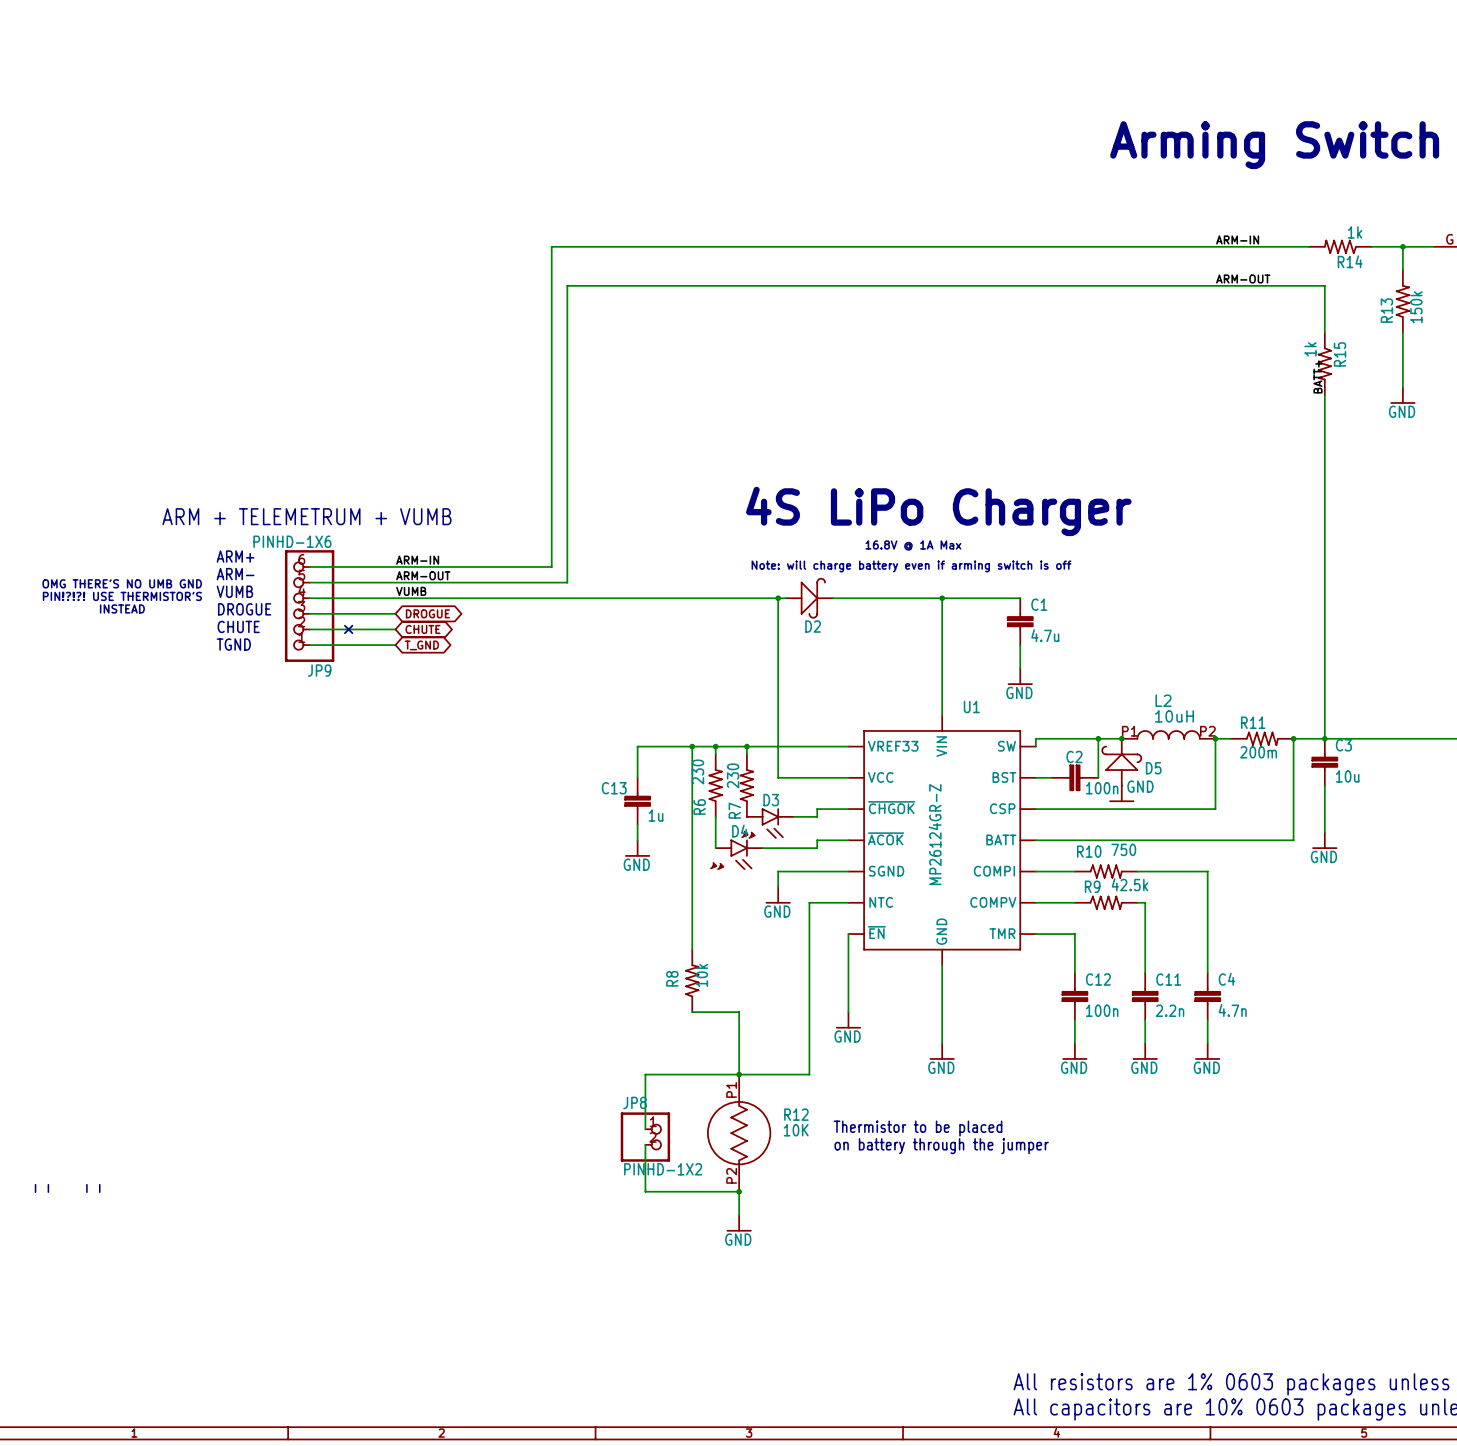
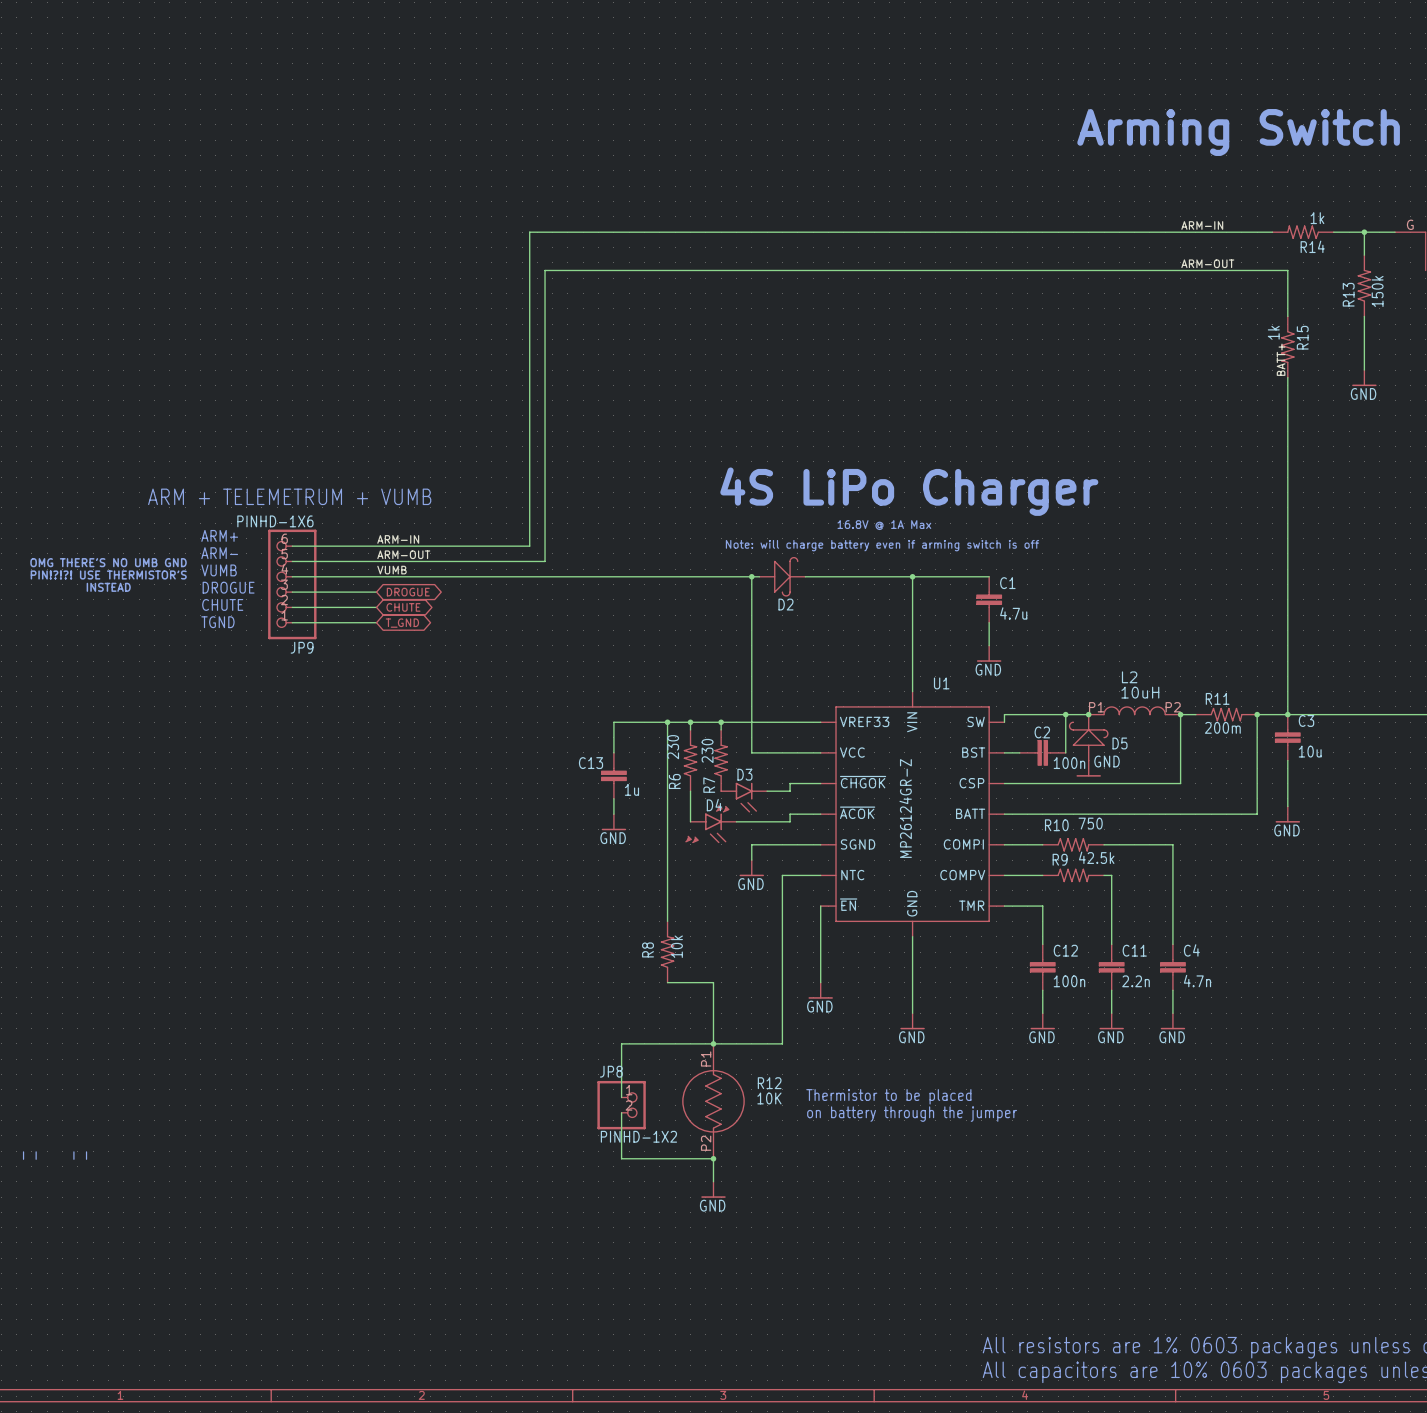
no-connect mark: (348, 629) -> none

